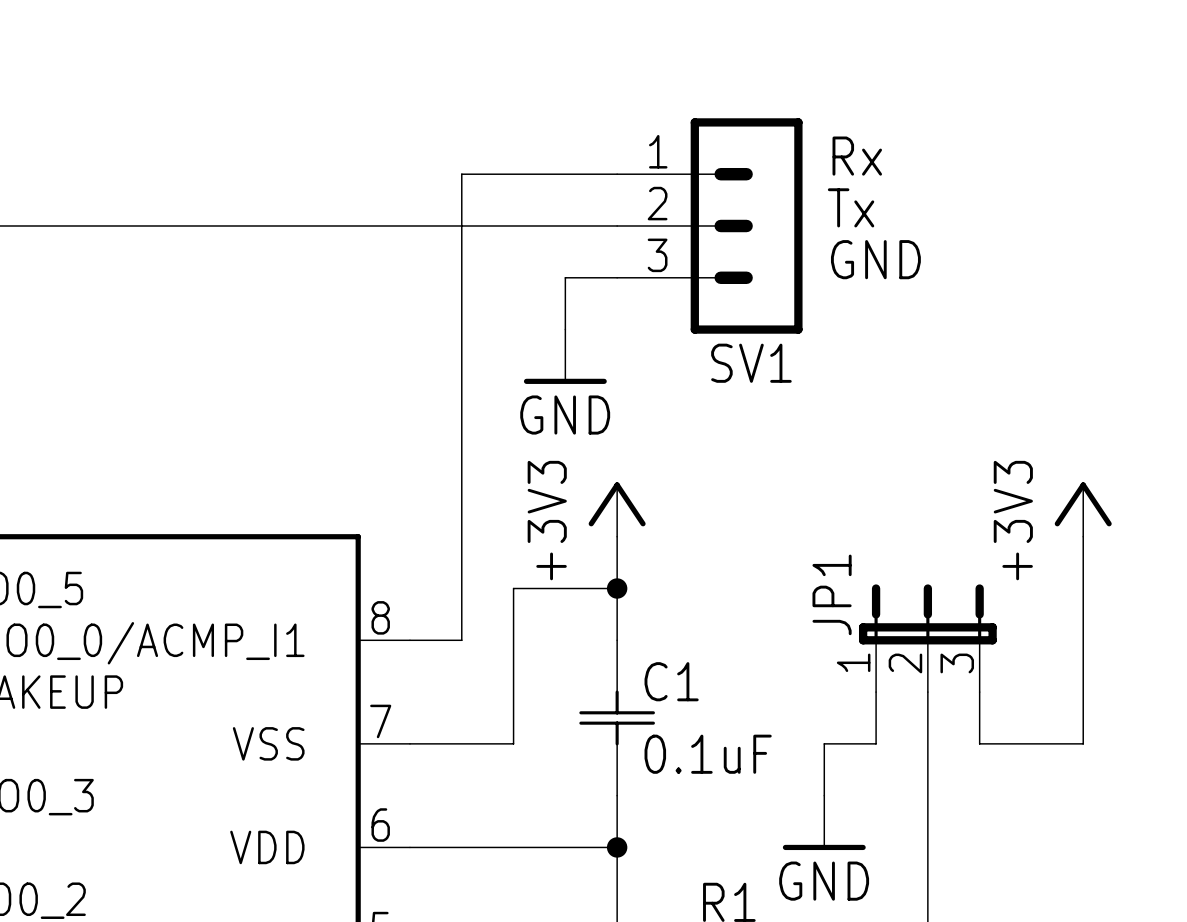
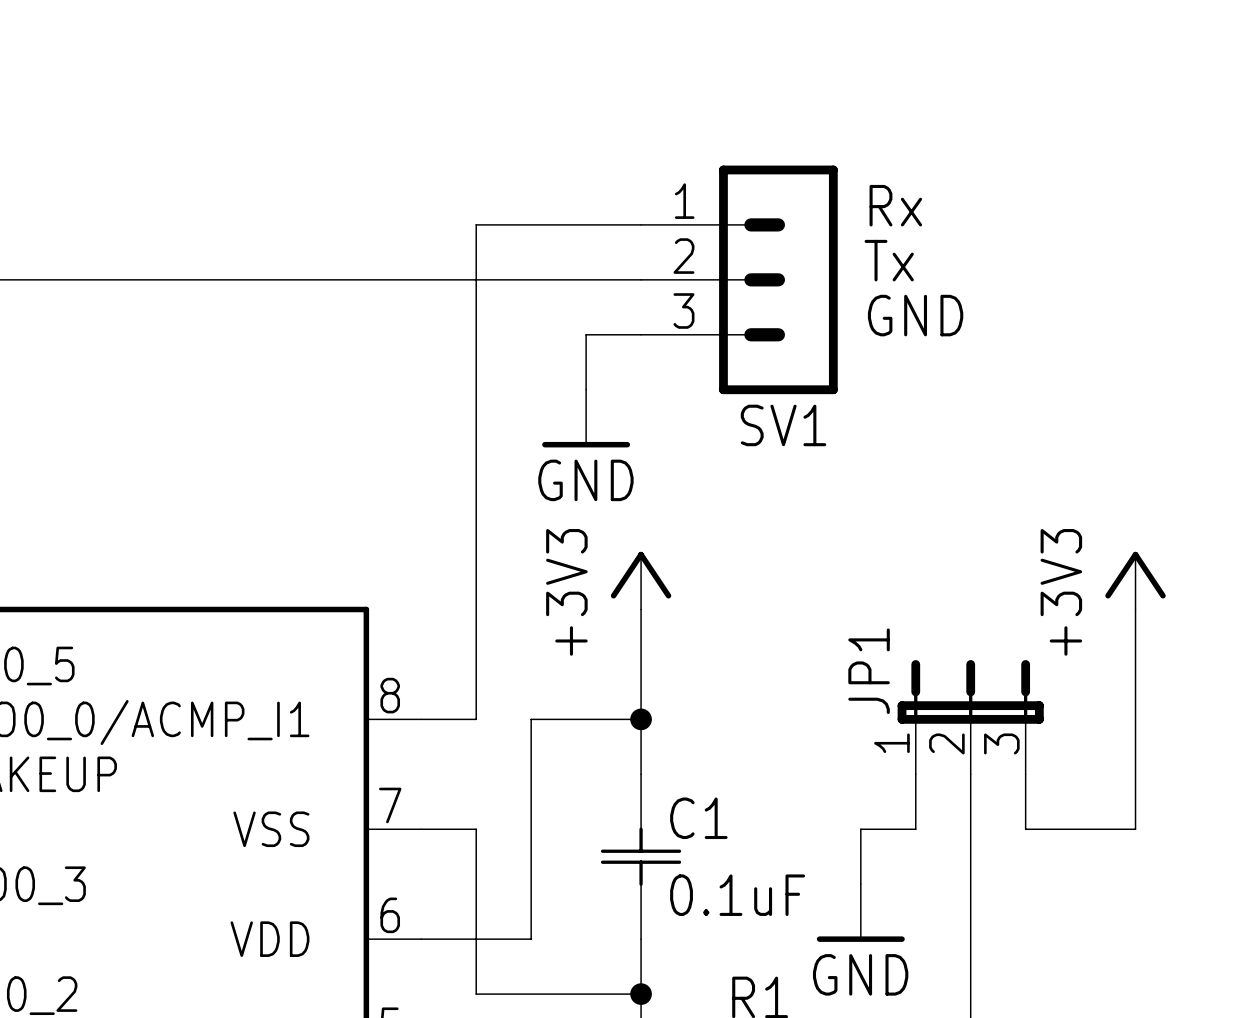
wire: (617, 588) (513, 588) (513, 640) -> (641, 774) (641, 719) (531, 719)
junction position: (617, 588) -> (641, 719)
C1 position: (617, 717) -> (641, 856)
wire: (461, 743) (513, 743) -> (476, 829) (476, 994) (641, 994)
wire: (617, 795) (617, 847) (513, 847) -> (531, 829) (531, 939)
junction position: (617, 847) -> (641, 994)

